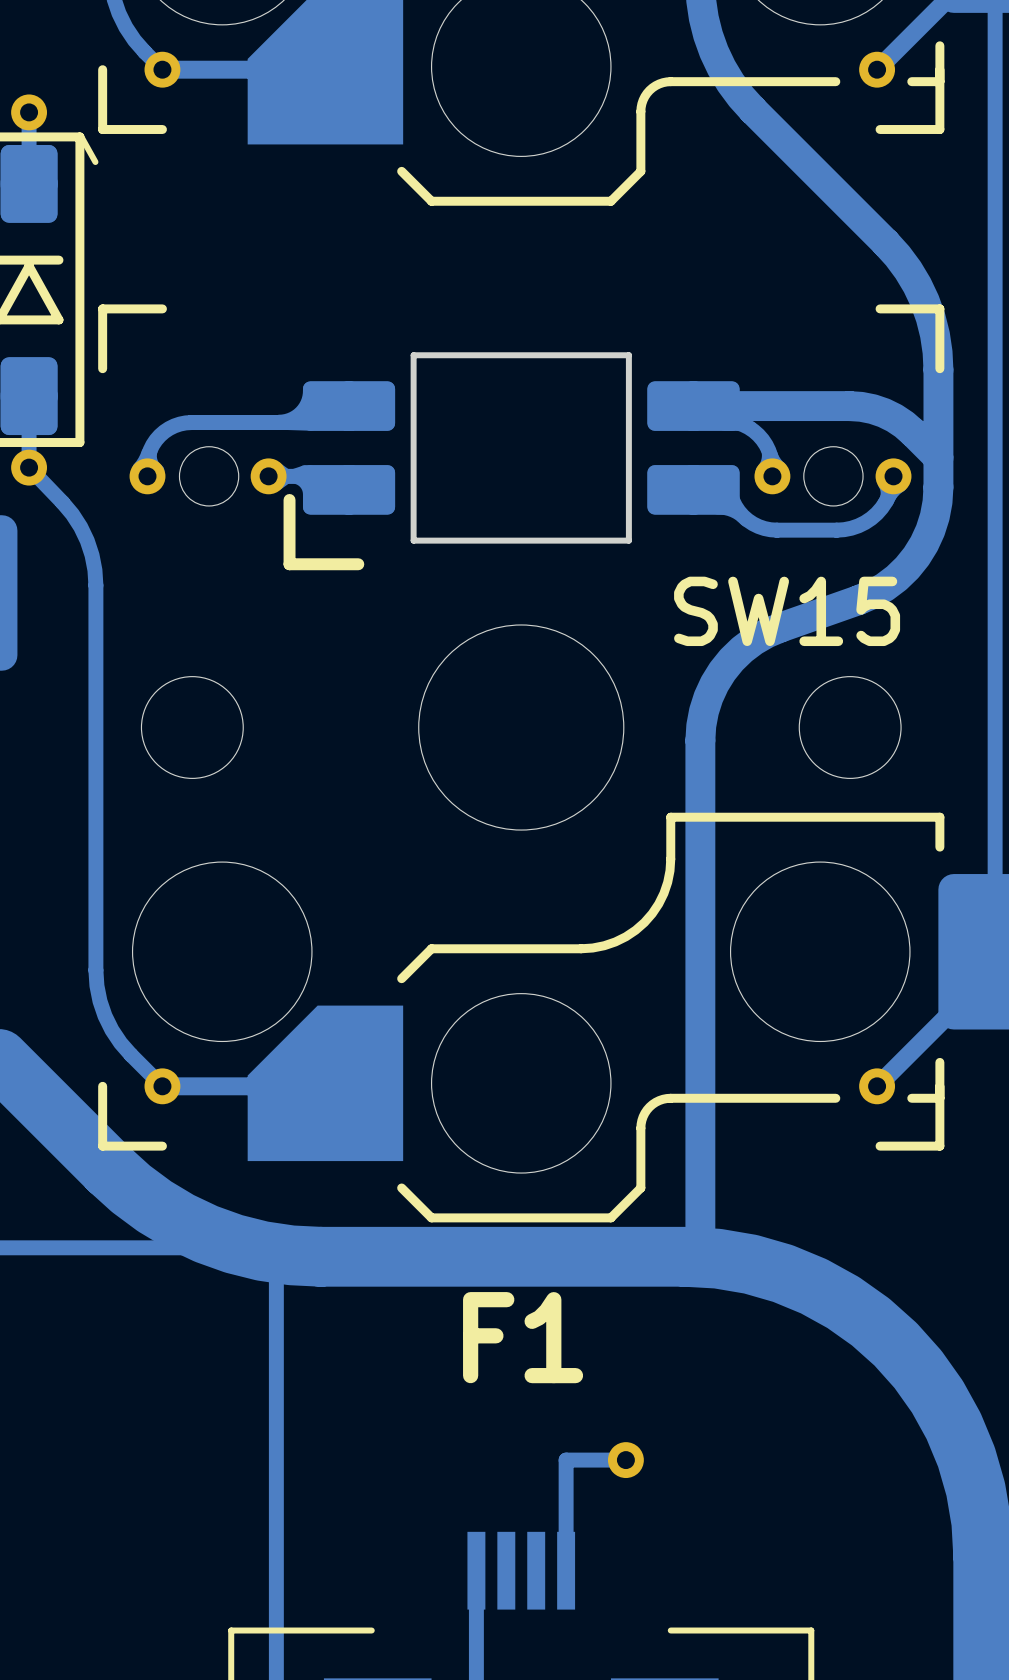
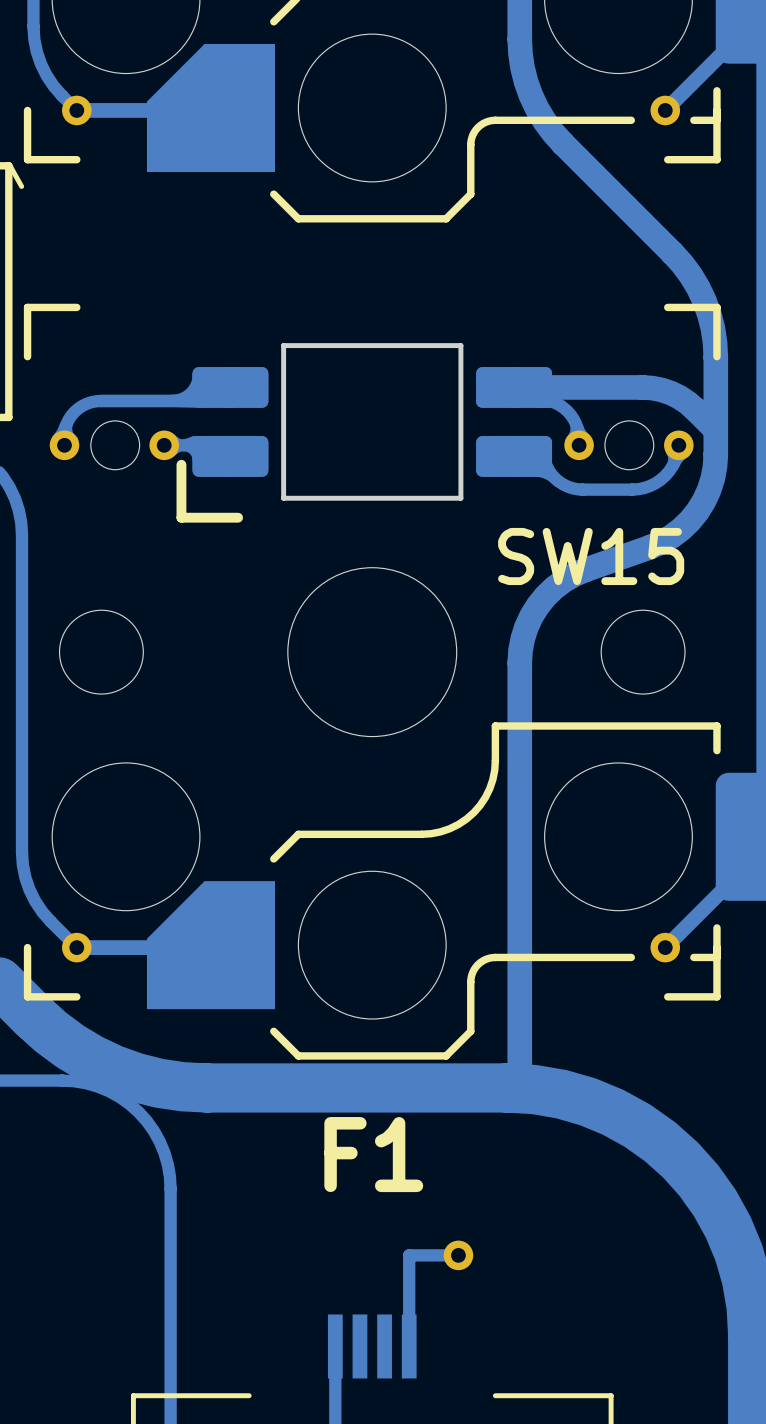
track: (144, 1247) (276, 1247) (276, 1379) -> (62, 1080) (98, 1086) (119, 1097) (138, 1112) (154, 1131) (164, 1153) (170, 1188)

